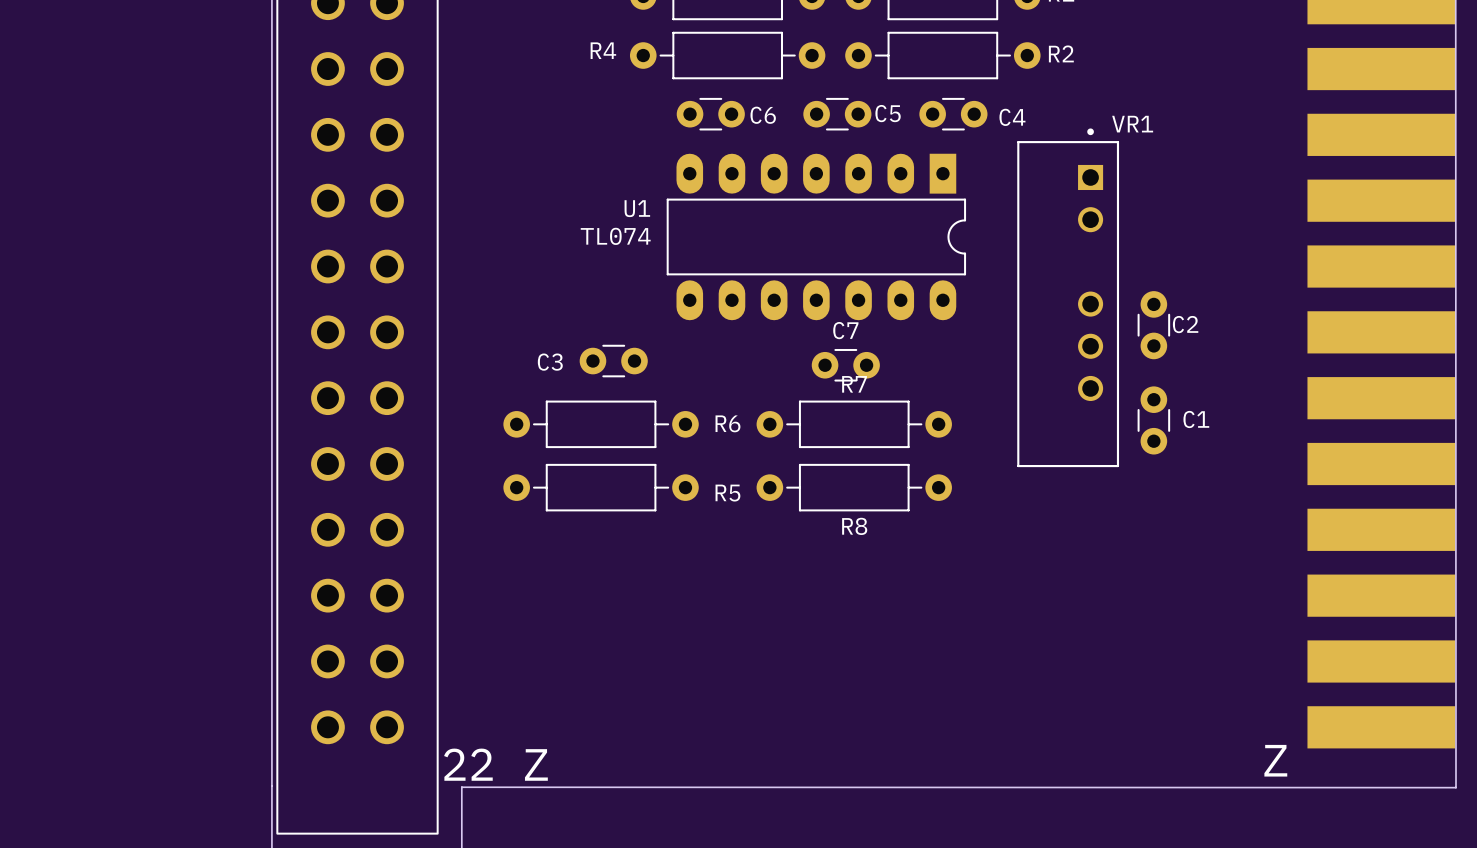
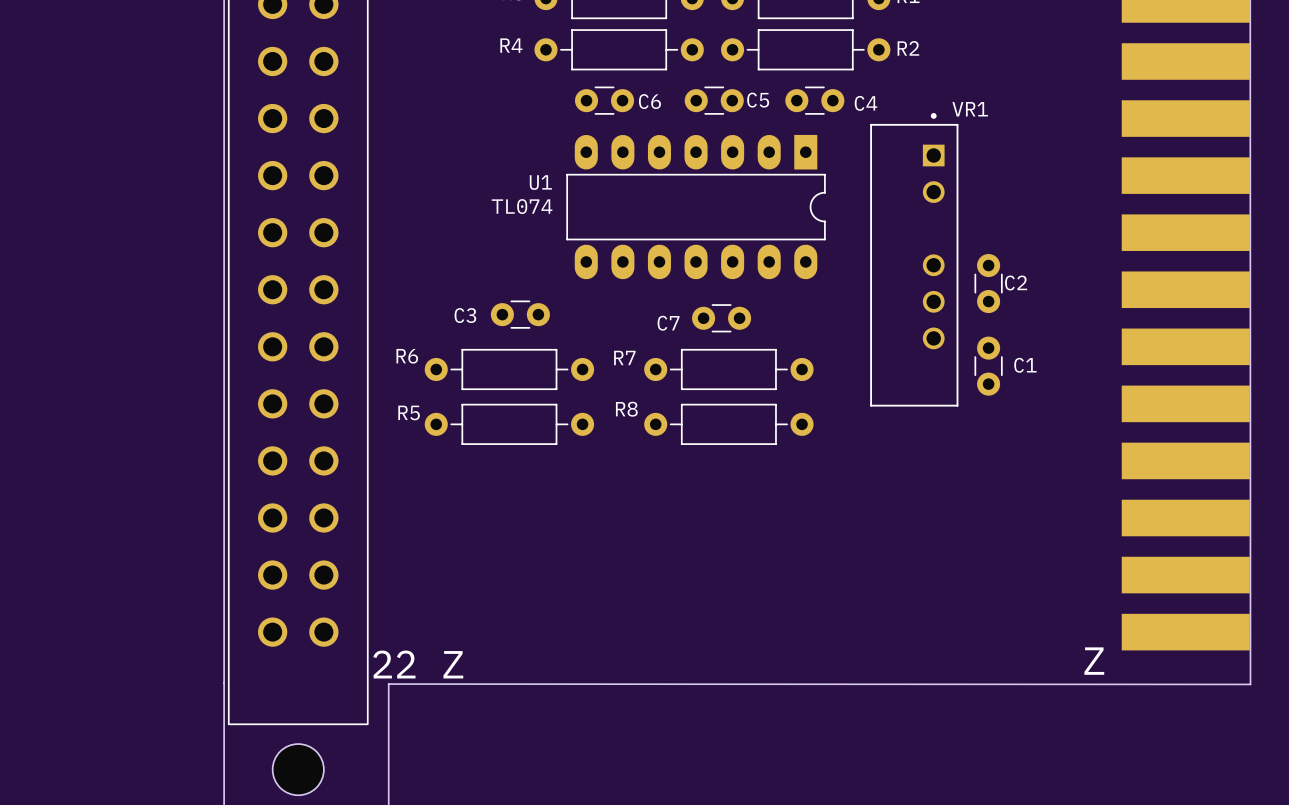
C7 name position: C7 (845, 330) -> C7 (668, 323)
R7 name position: R7 (854, 384) -> R7 (624, 357)
R6 name position: R6 (727, 423) -> R6 (407, 356)
R5 name position: R5 (727, 493) -> R5 (409, 412)
R8 name position: R8 (854, 526) -> R8 (626, 409)

